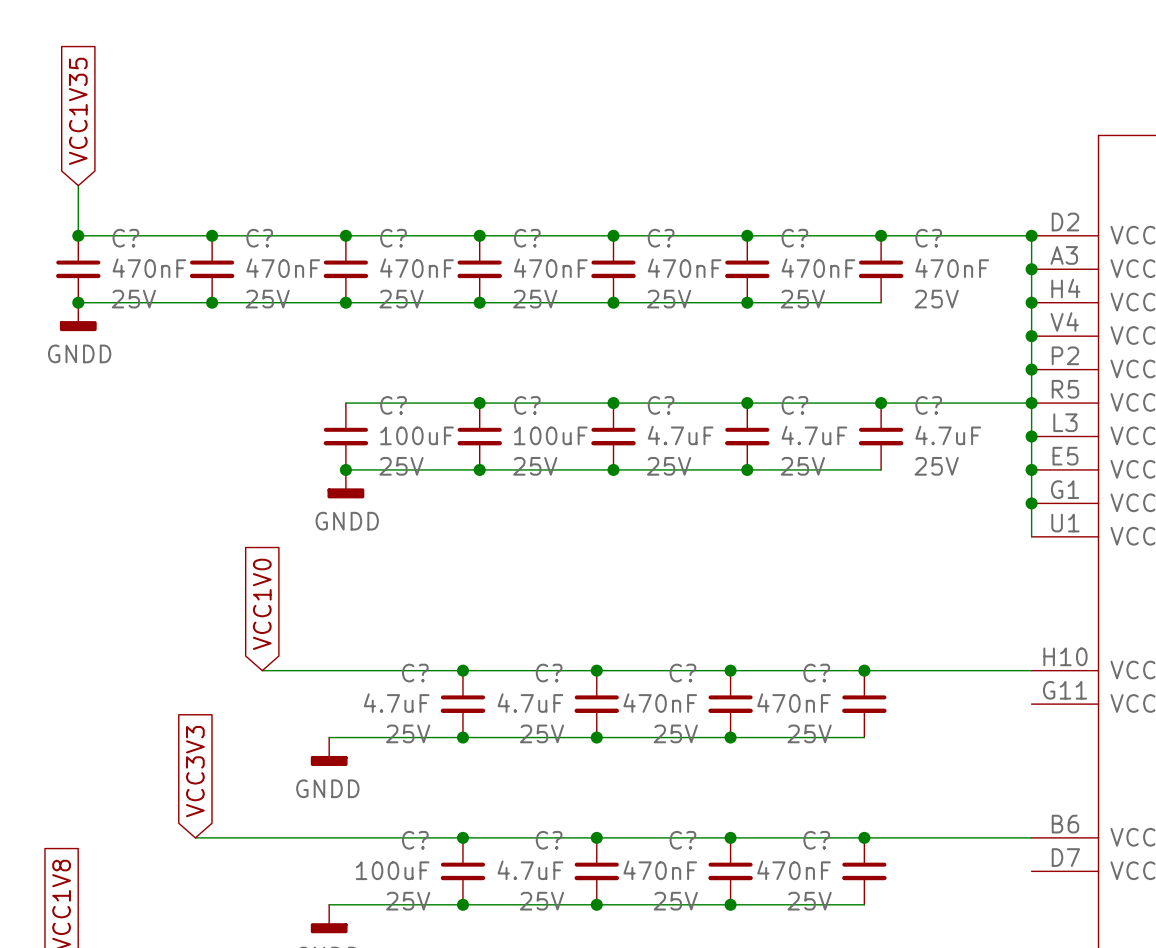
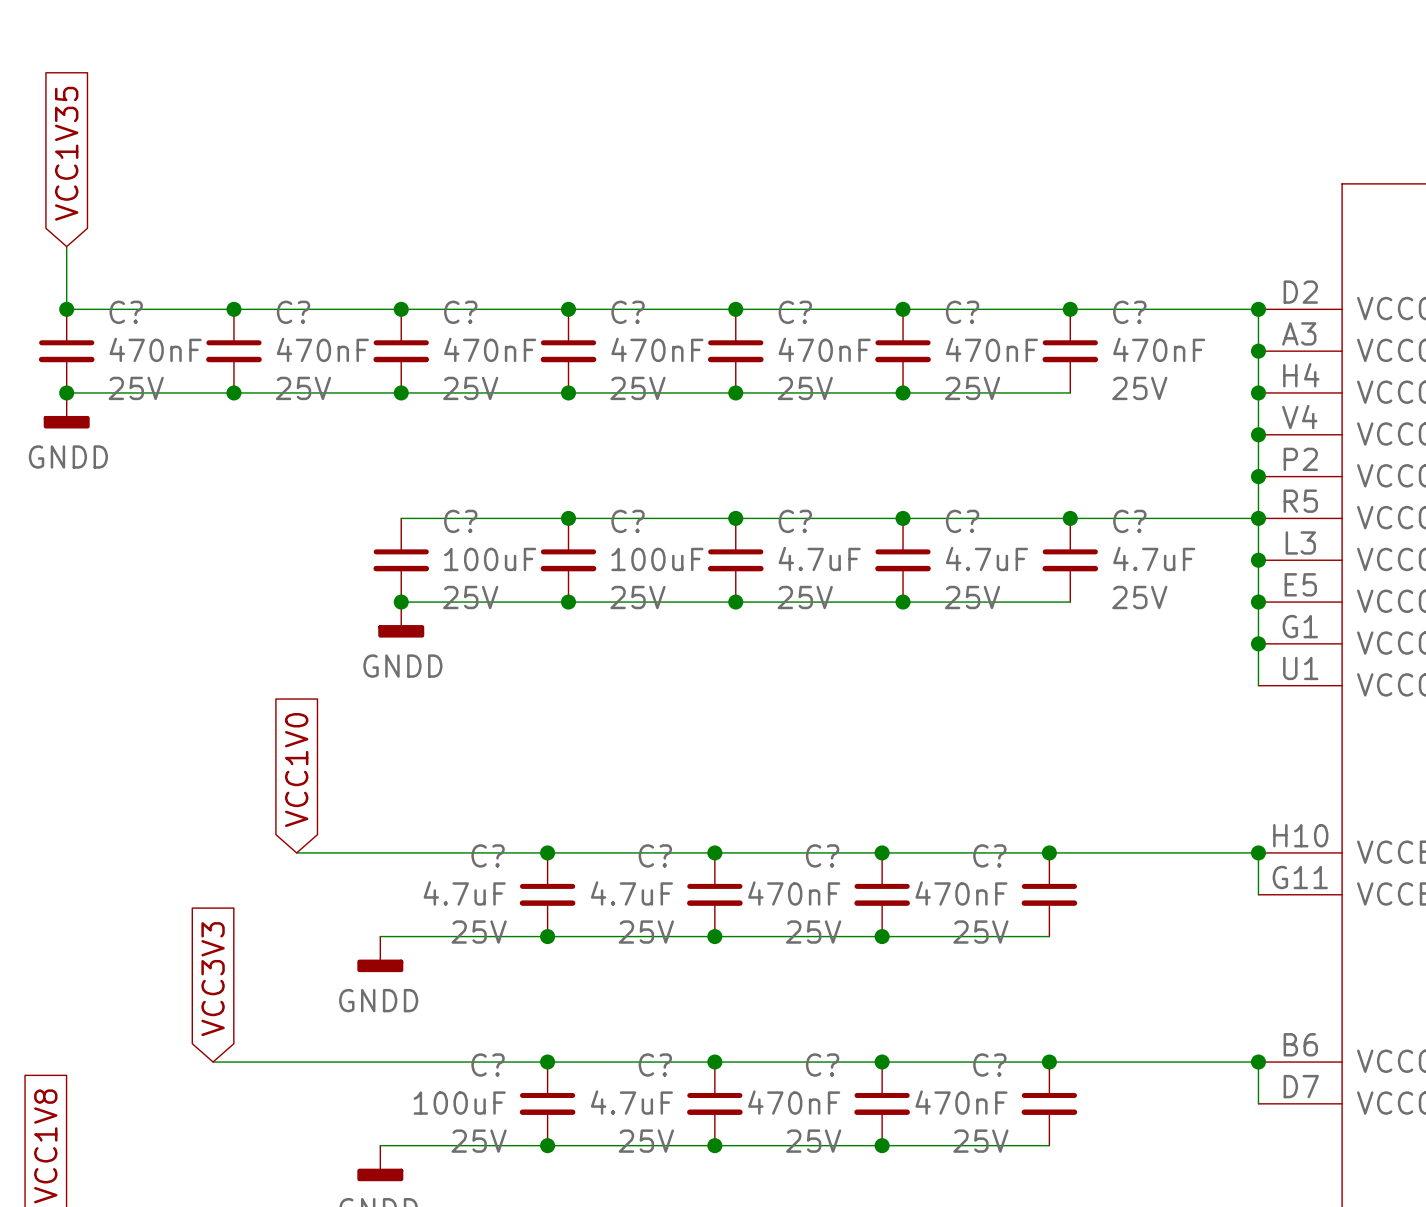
wire: none -> (1258, 852) (1258, 894)
junction: none -> (1258, 852)
wire: none -> (1258, 1062) (1258, 1103)
junction: none -> (1258, 1062)

